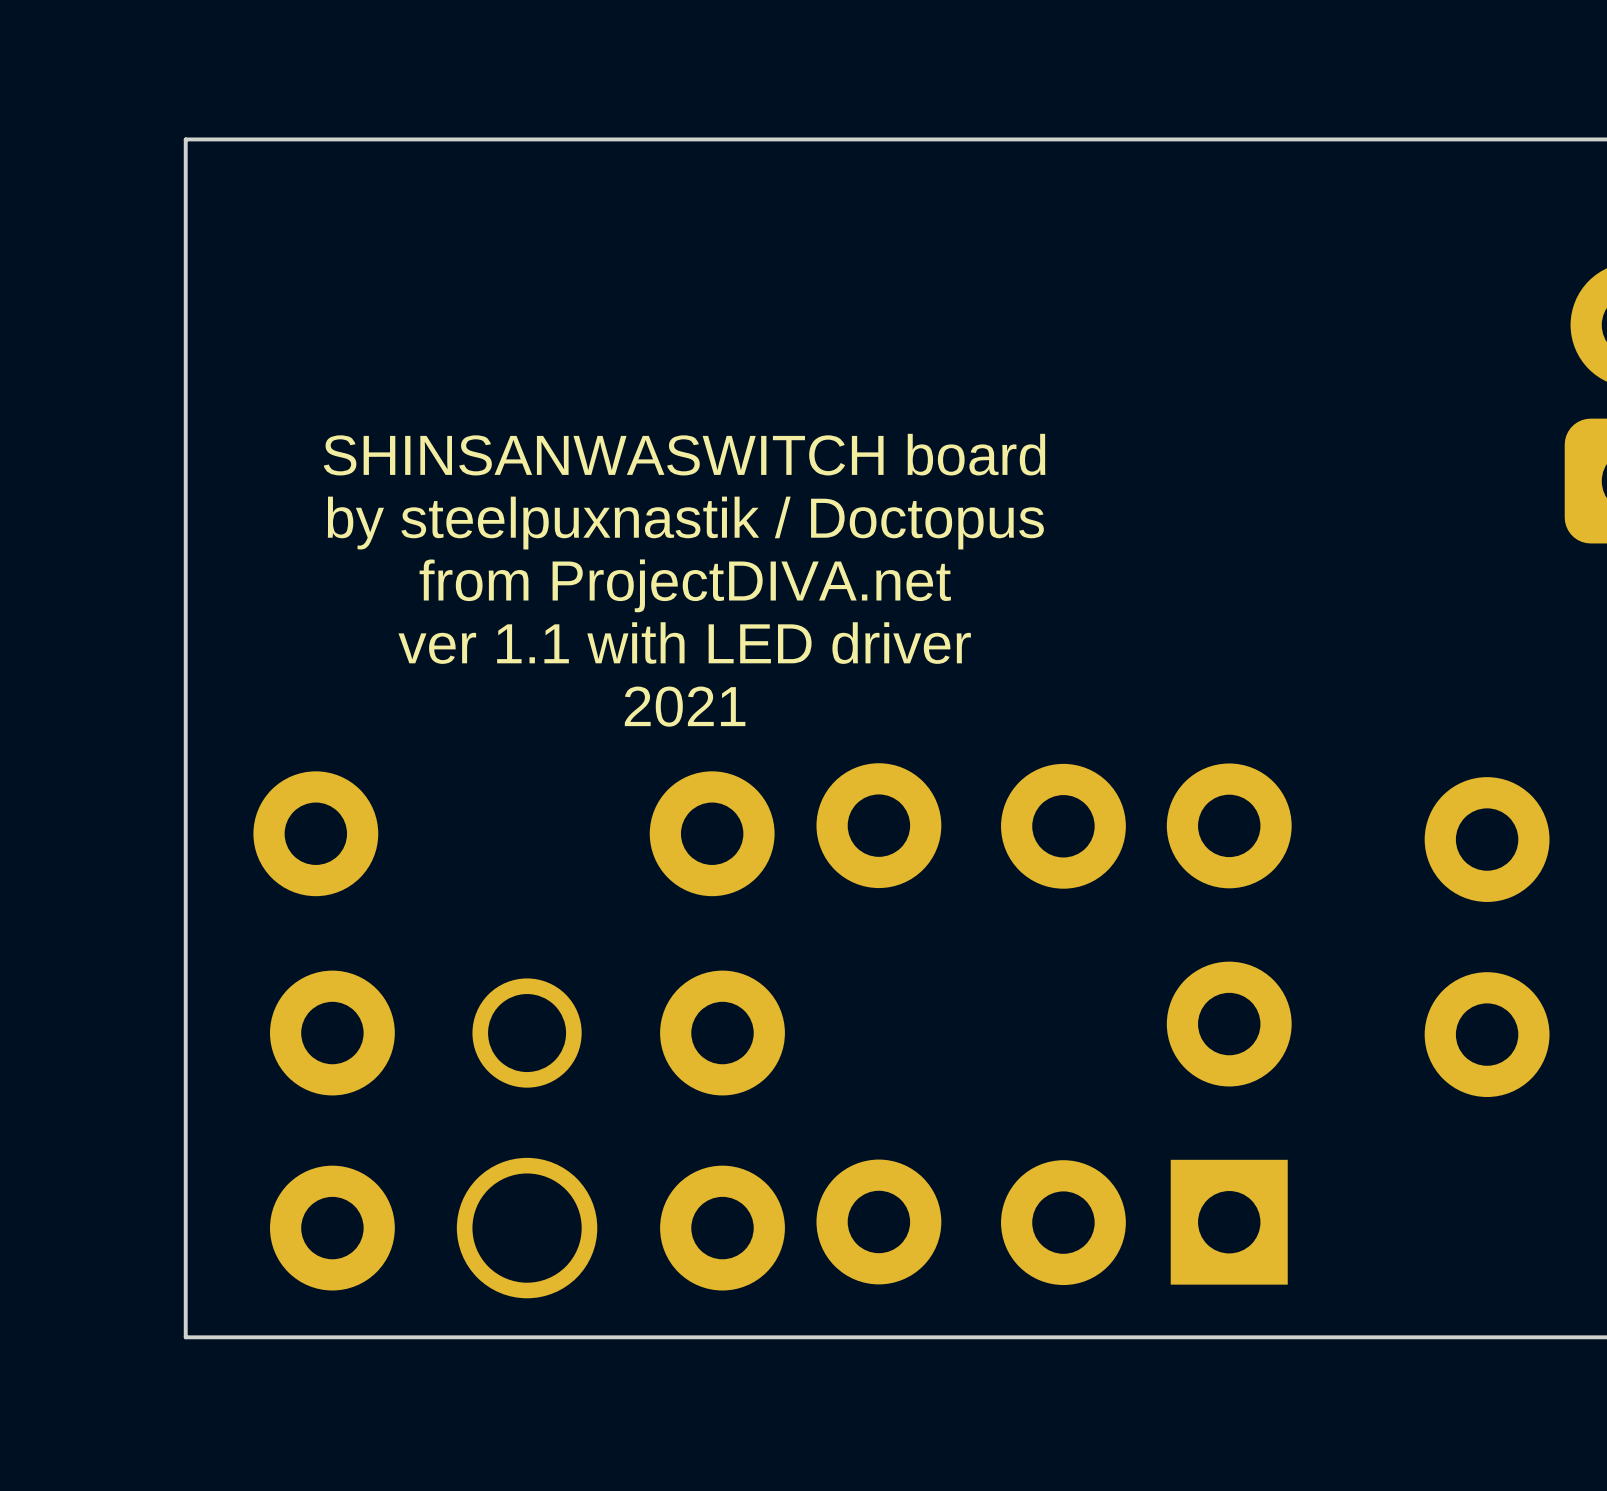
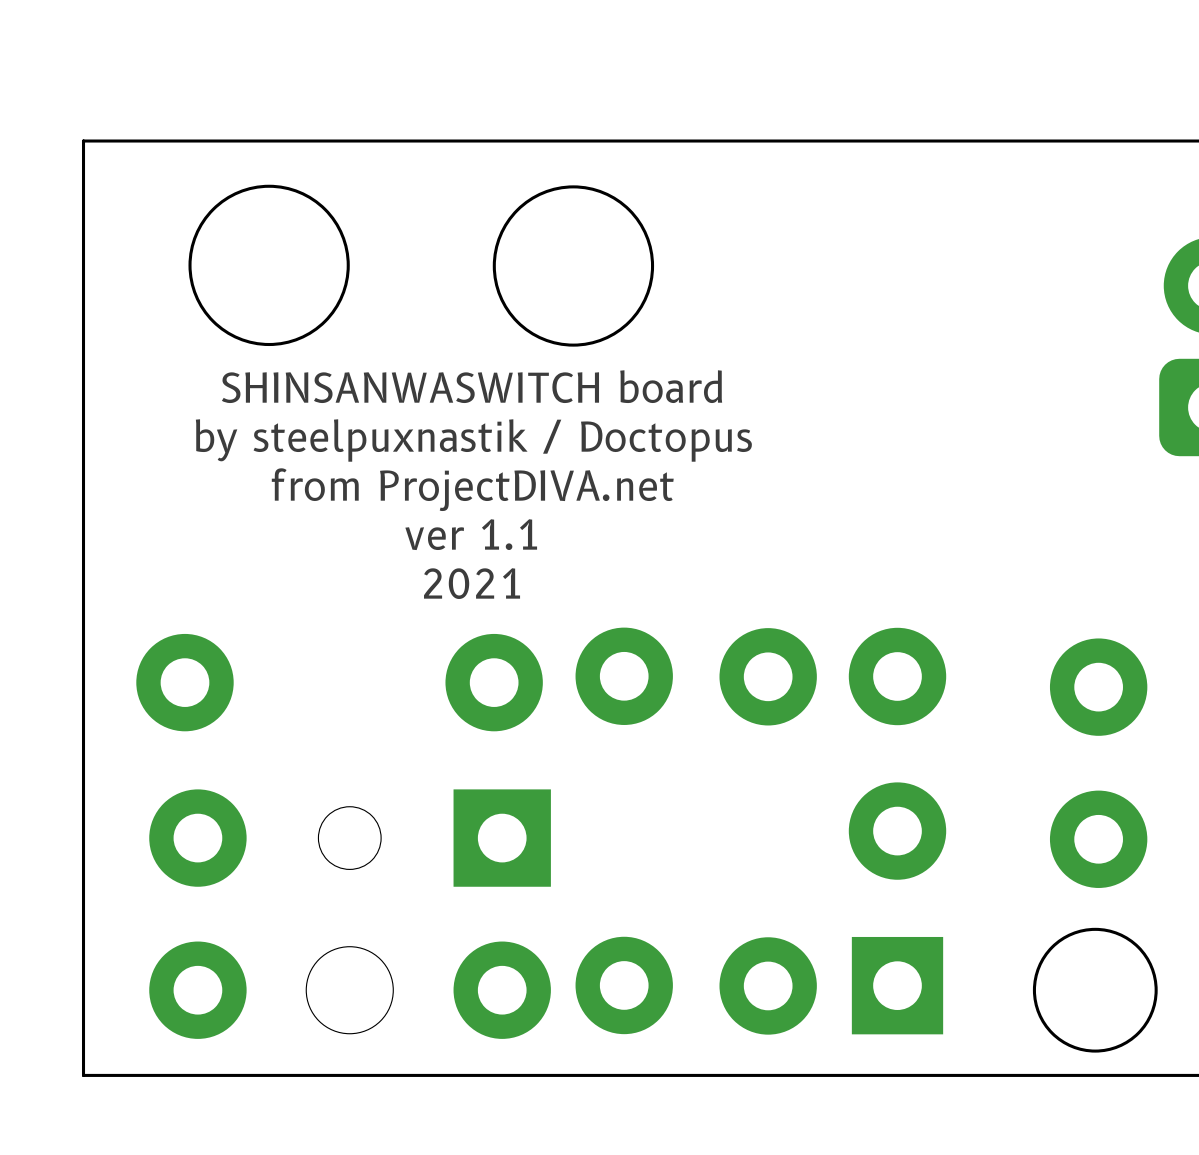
round board edge: none -> [188, 184, 350, 347]
round board edge: none -> [492, 185, 655, 347]
text: ver 1.1 with LED driver (684, 643) -> ver 1.1 (471, 534)
part footprint: [269, 970, 785, 1299] -> [149, 789, 551, 1039]
round board edge: none -> [1032, 927, 1158, 1053]

